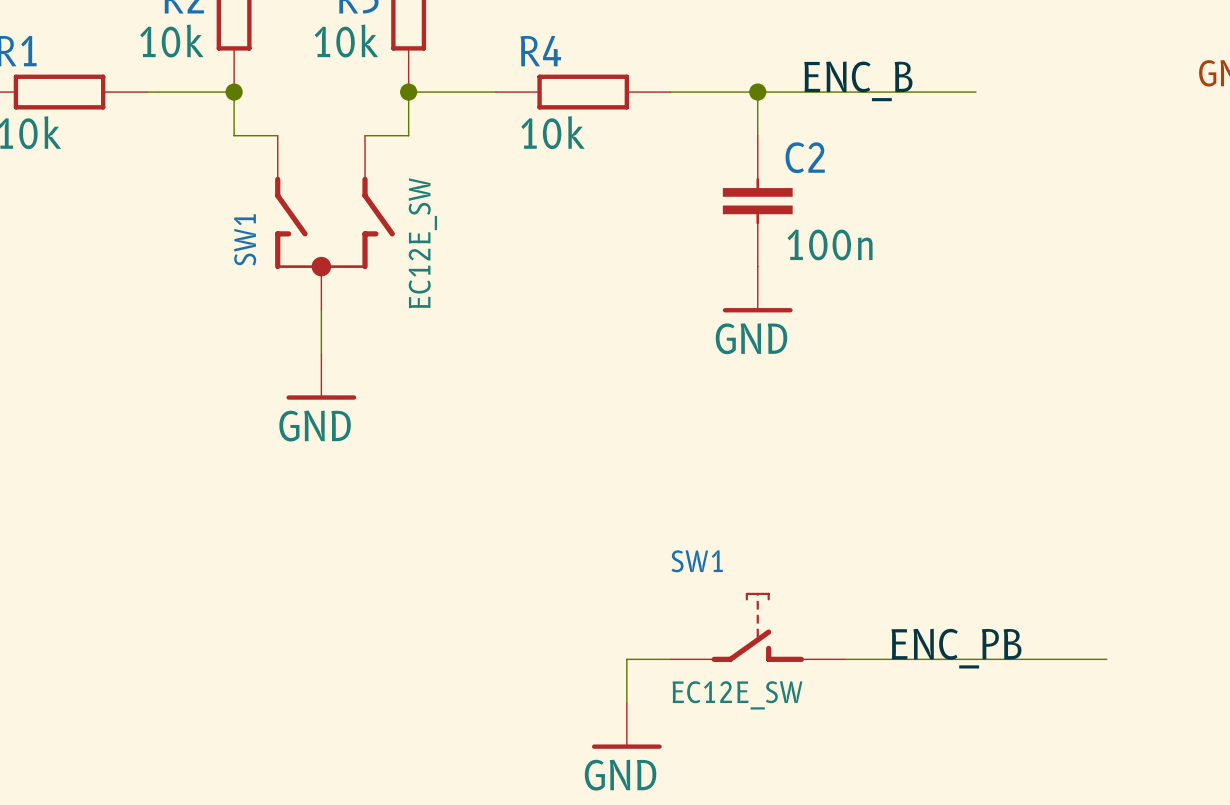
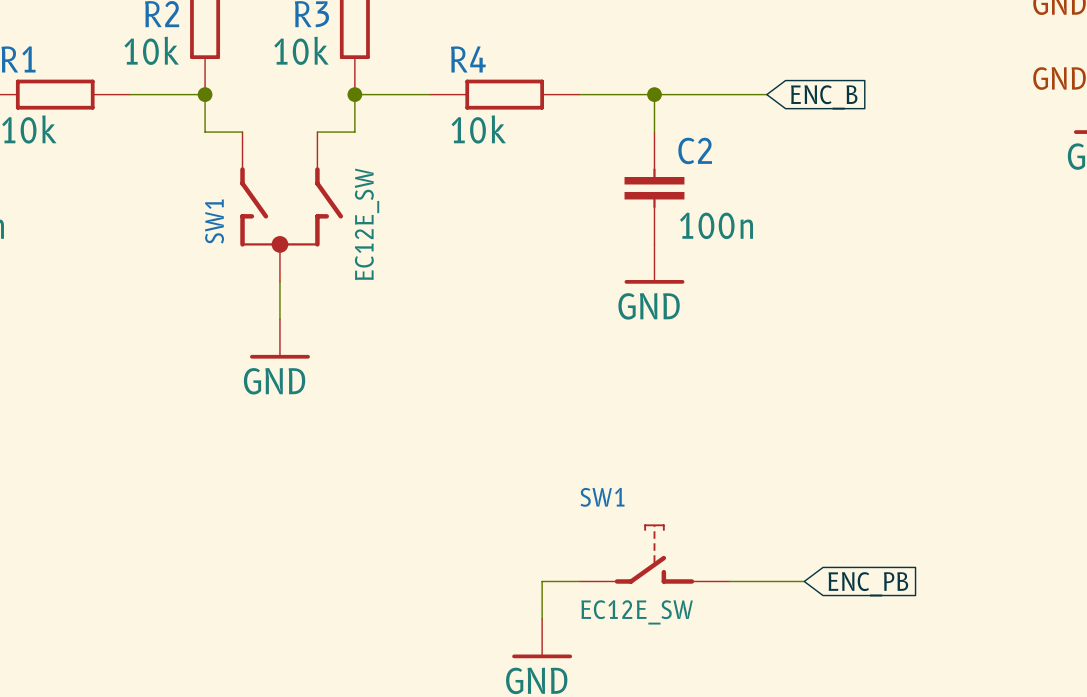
label: ENC_B (858, 81) -> none
wire: (888, 92) (975, 92) -> none
global label: none -> ENC_B (824, 97)
label: ENC_PB (956, 648) -> none
wire: (932, 659) (1106, 659) -> none
global label: none -> ENC_PB (868, 584)

